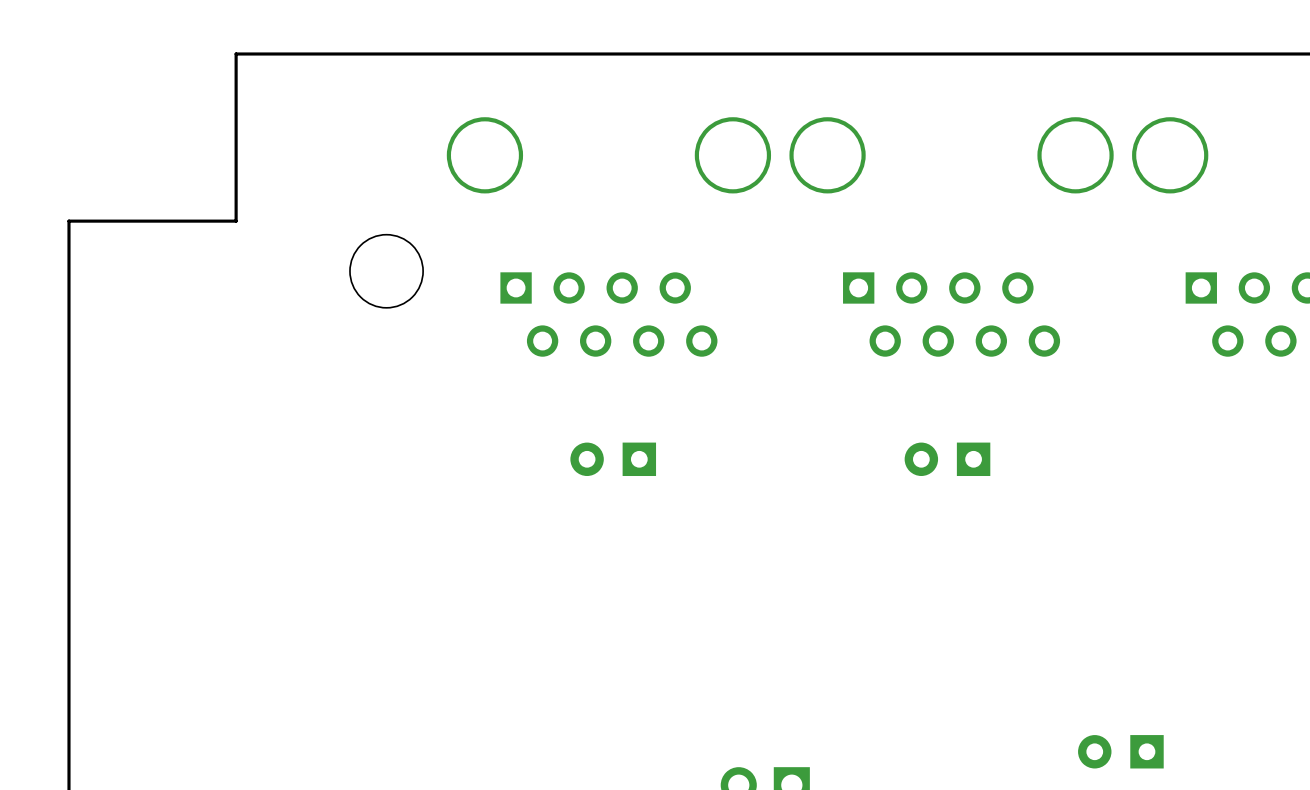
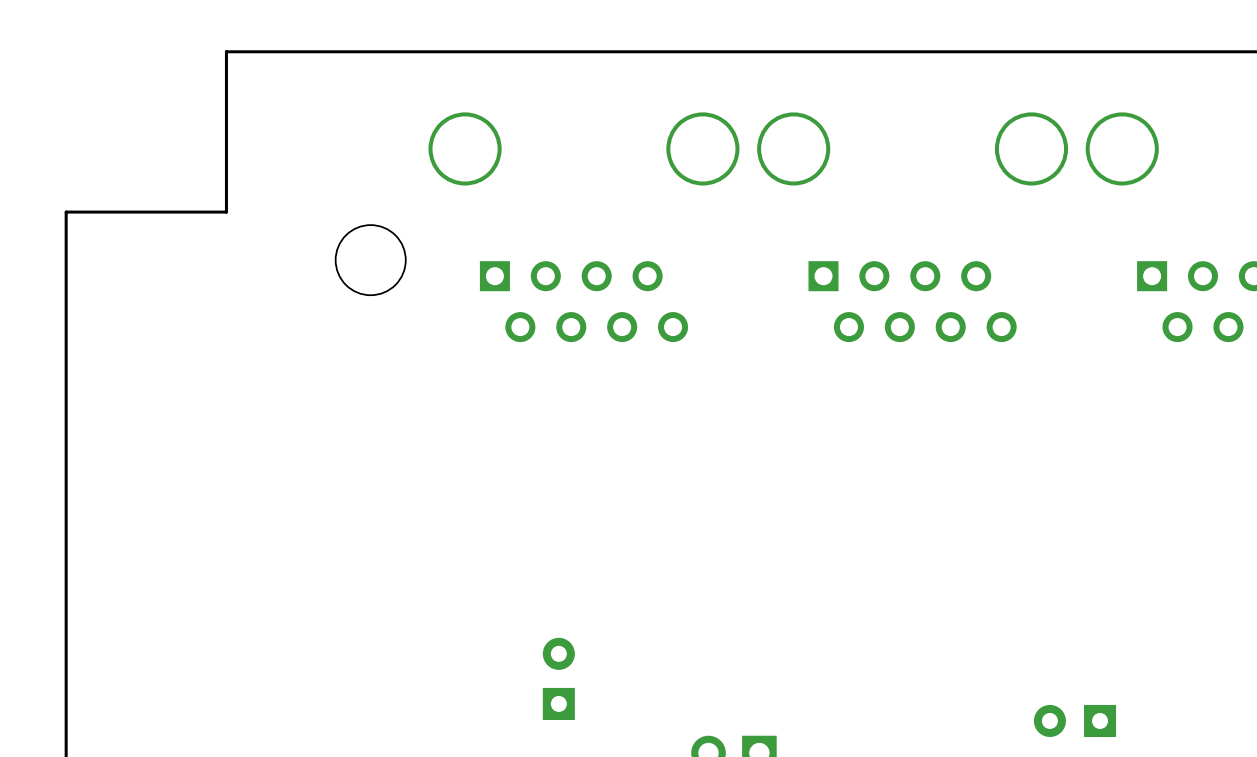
part: (613, 459) -> none
part: (947, 459) -> none
part: none -> (558, 678)

